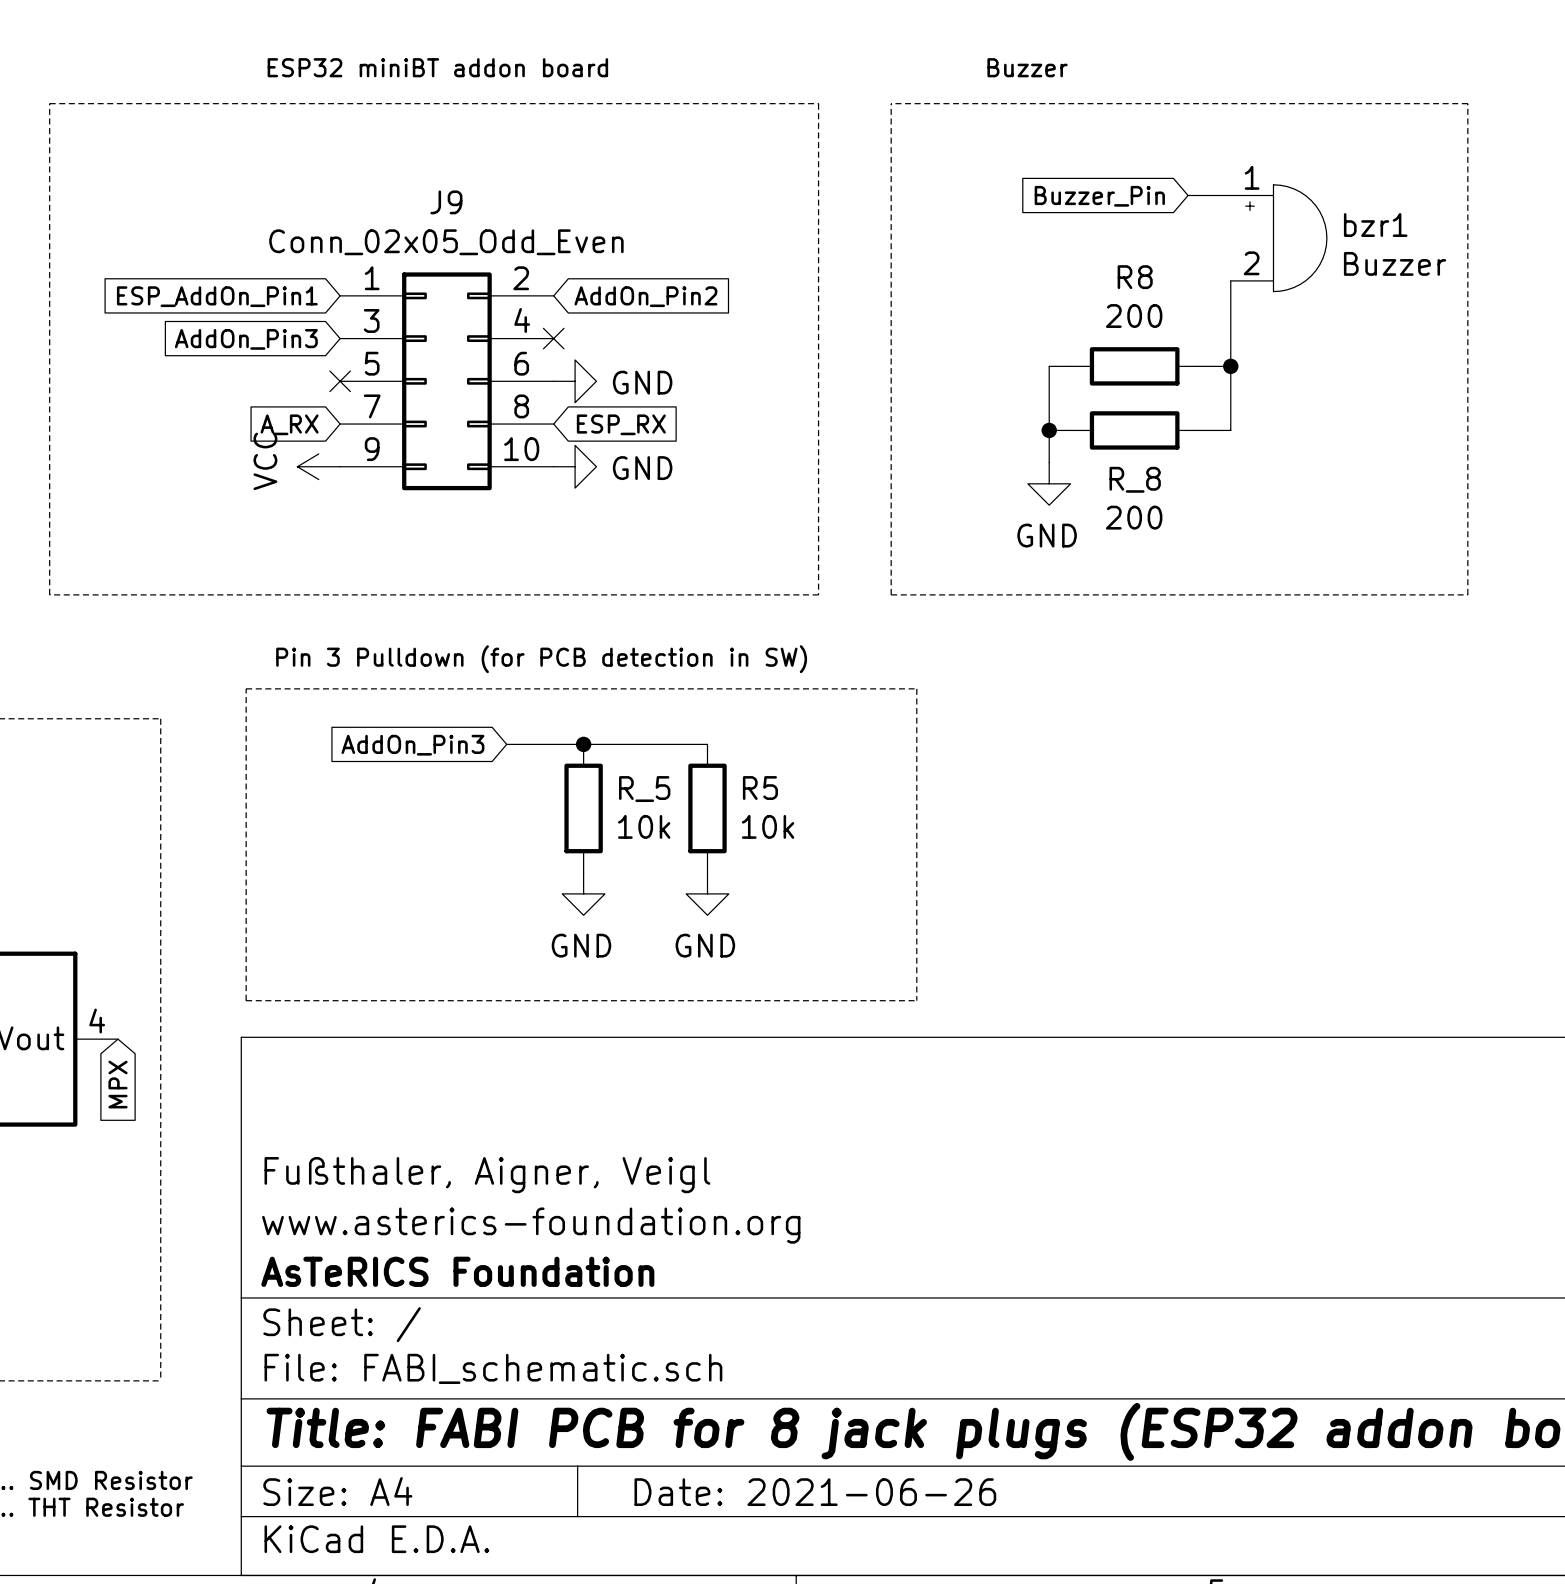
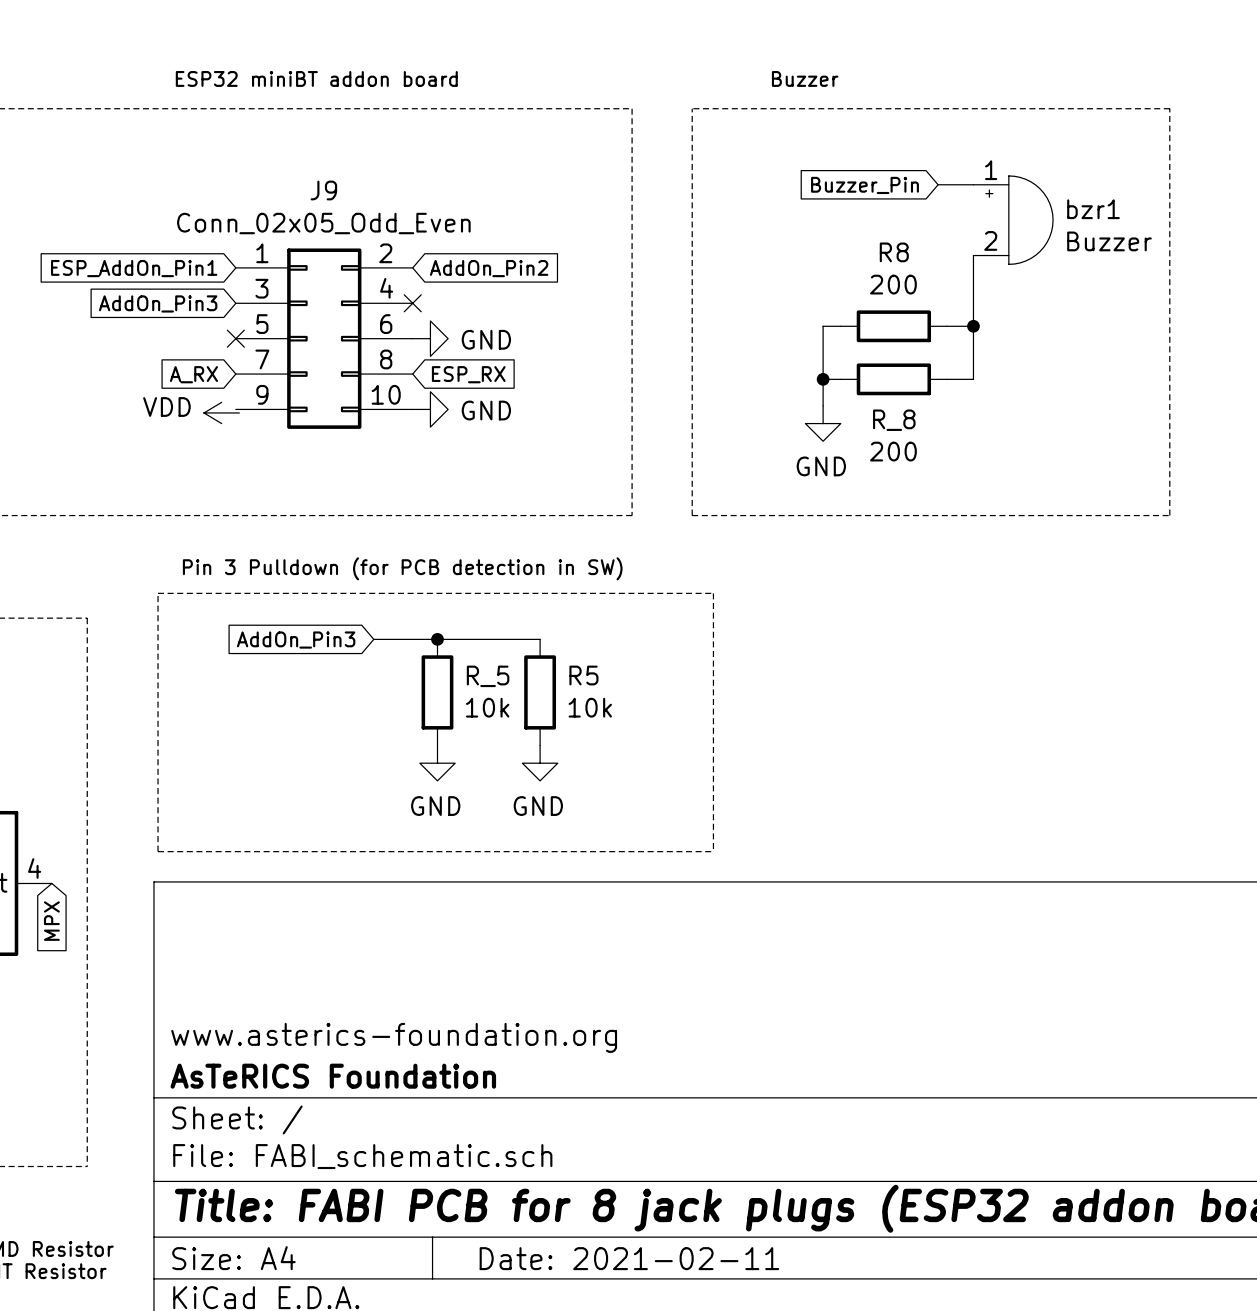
power symbol: VCC (318, 466) -> VDD (221, 412)
title block: Fußthaler, Aigner, Veigl (487, 1175) -> none
title block: Date: 2021-06-26 (815, 1492) -> Date: 2021-02-11 (629, 1258)

